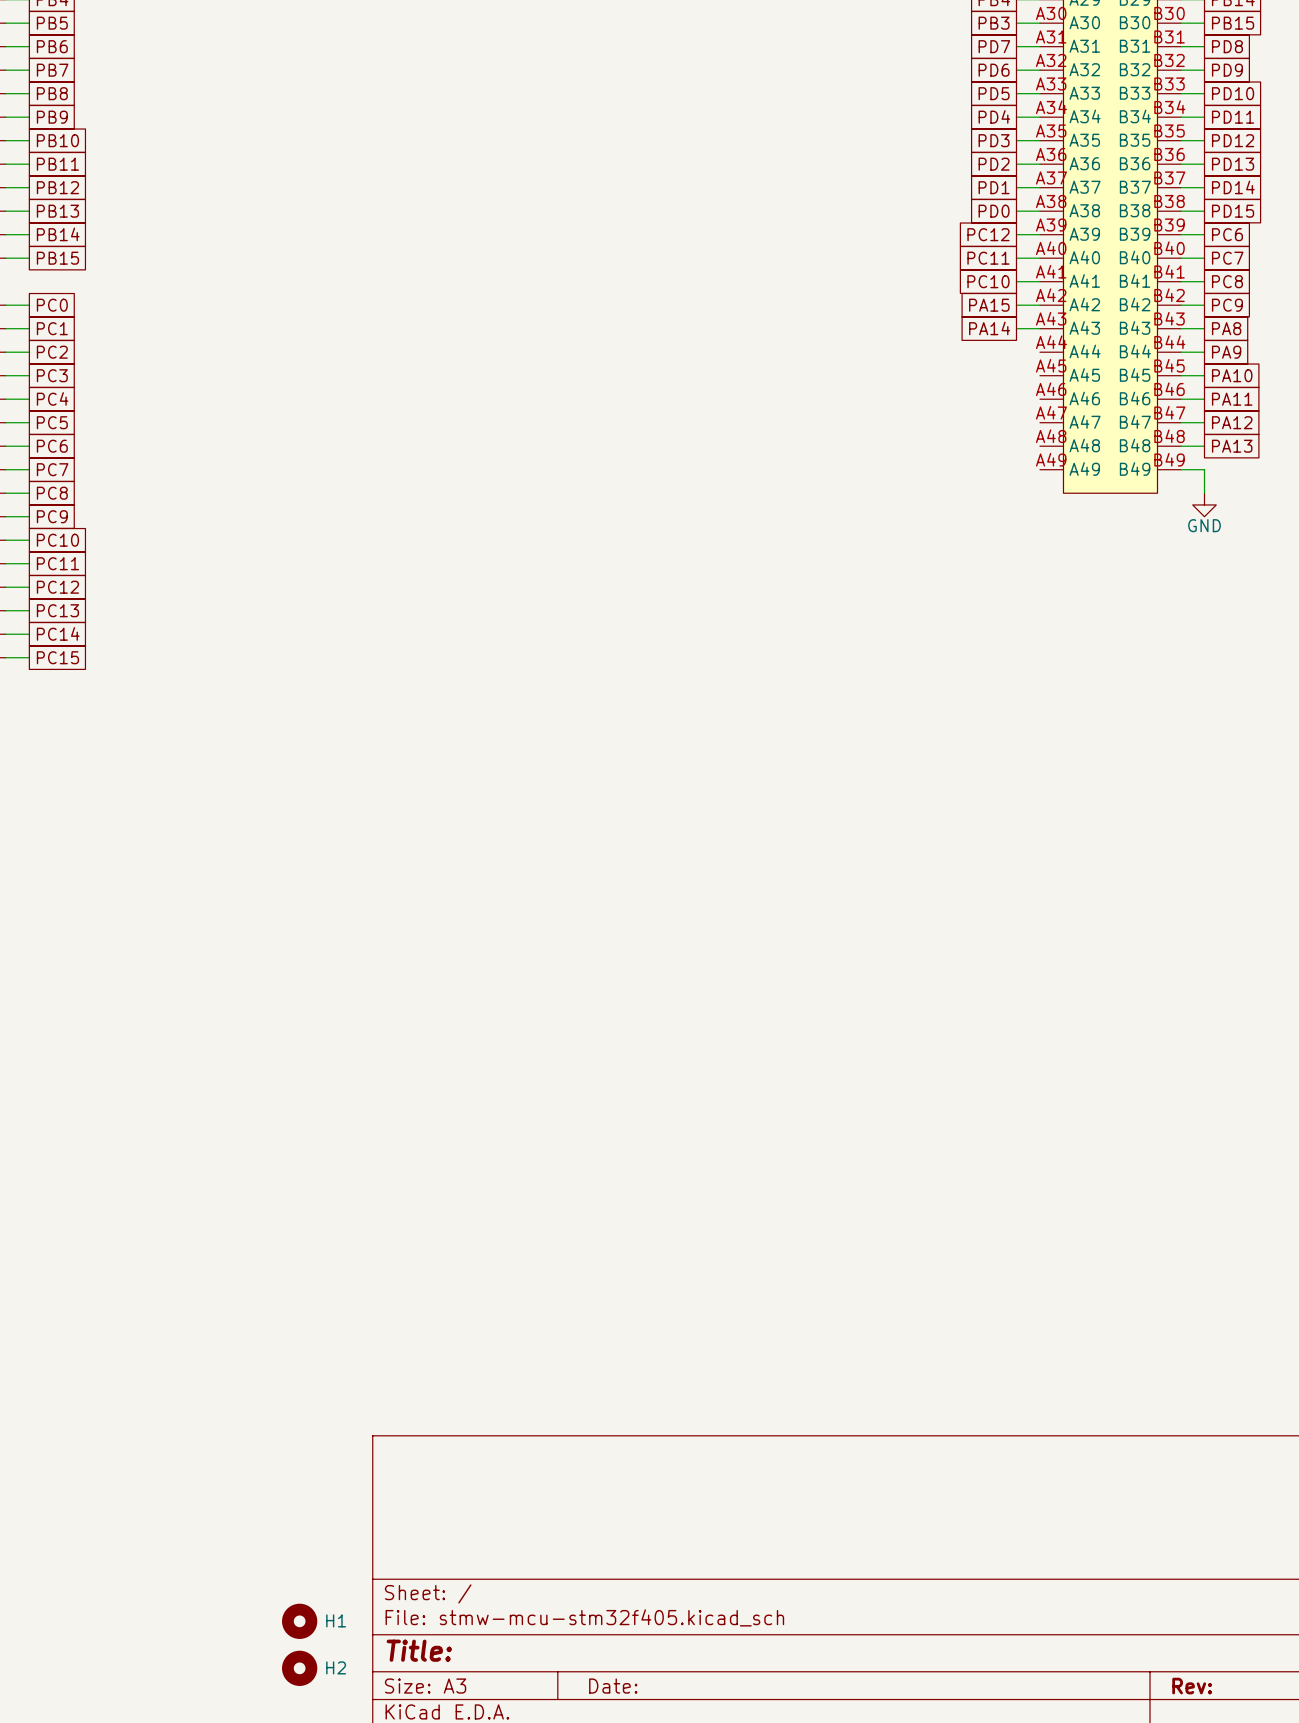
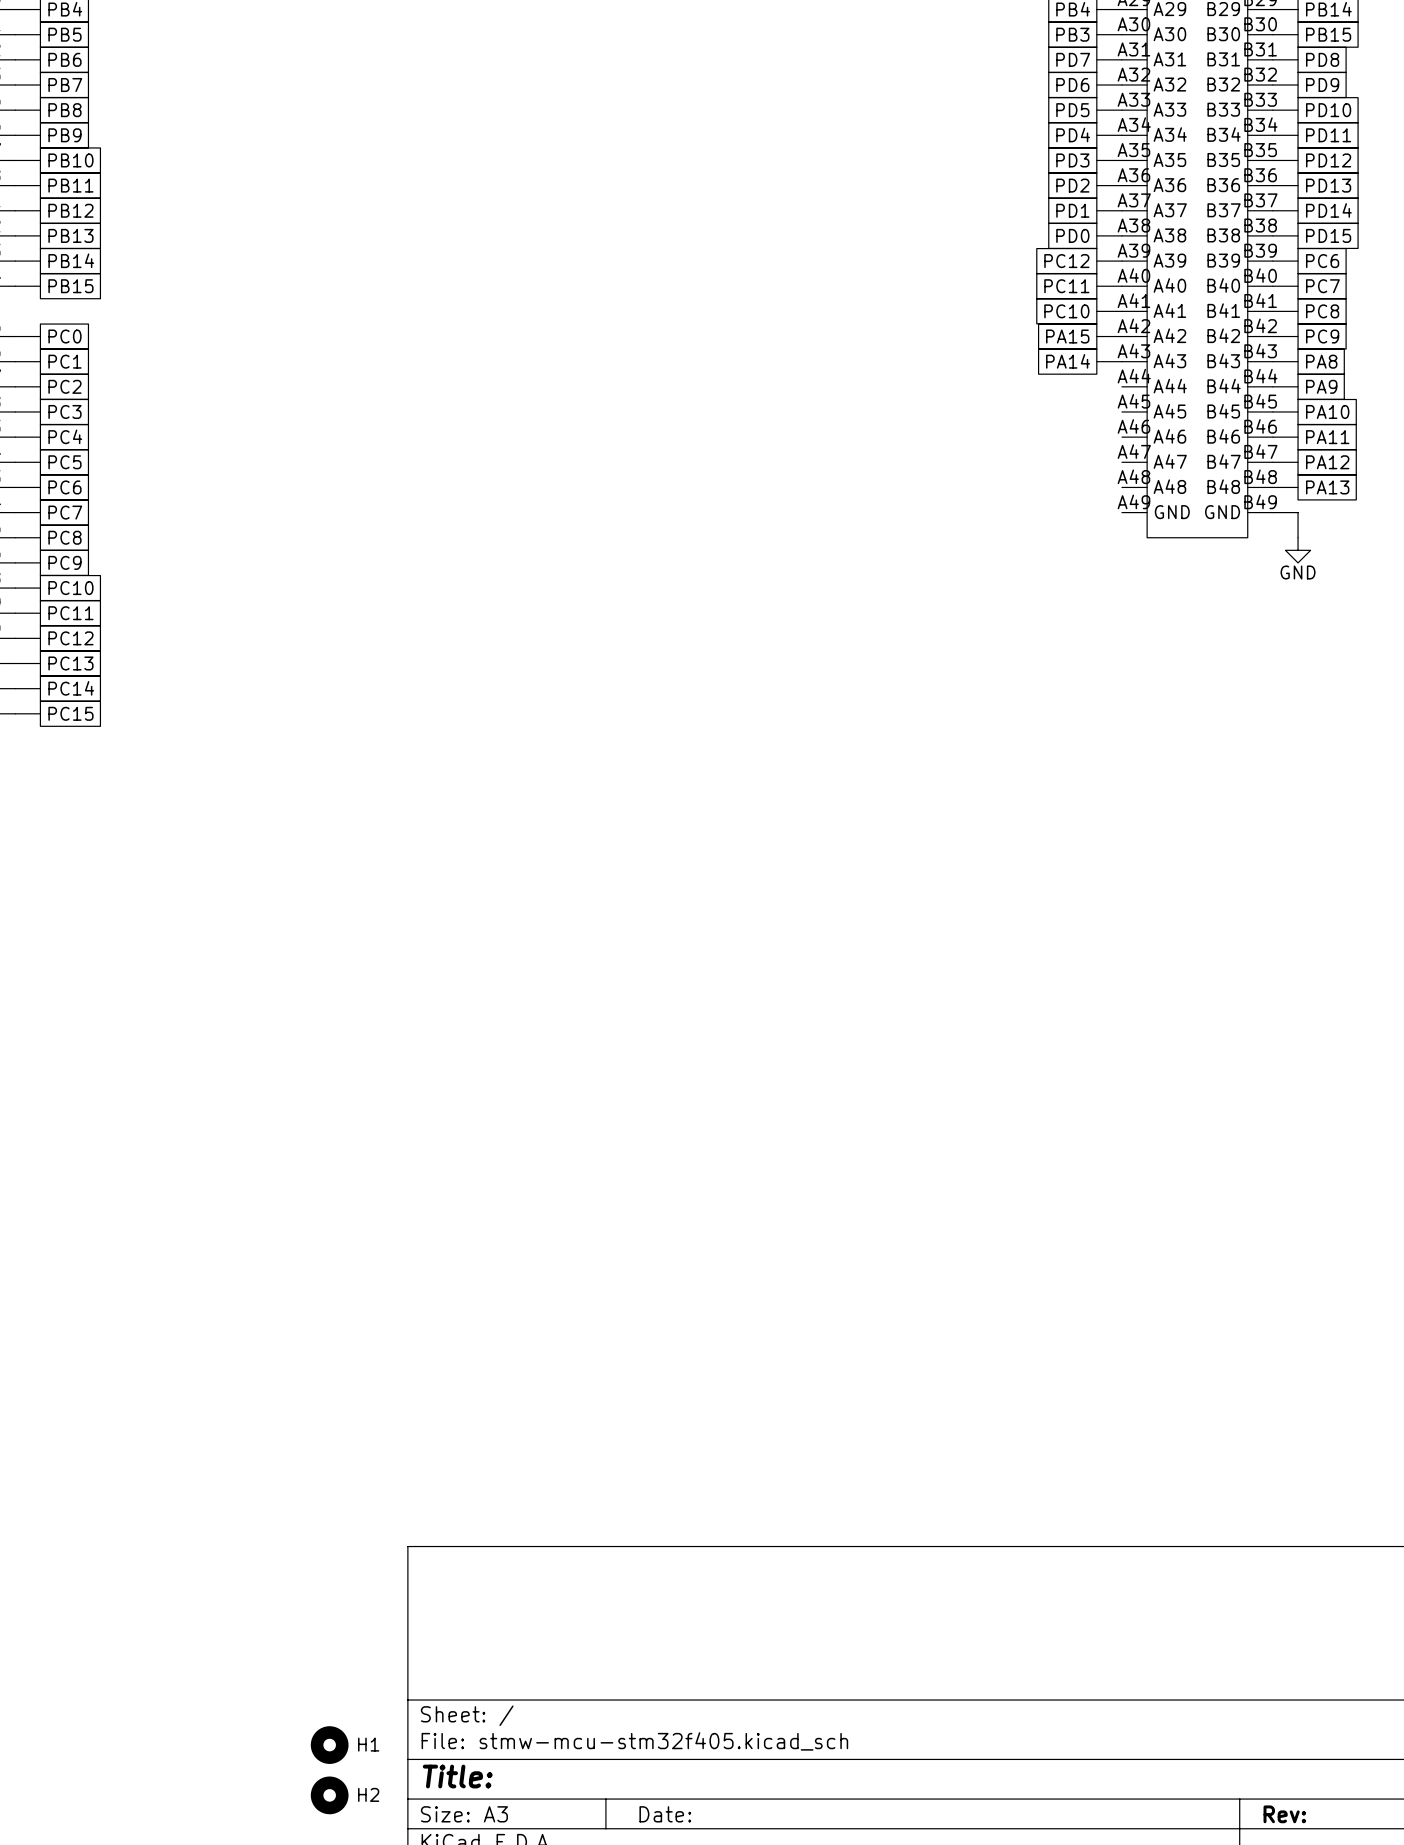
part pin name: A49 (1084, 468) -> GND (1172, 512)
part pin name: B49 (1135, 468) -> GND (1222, 512)

